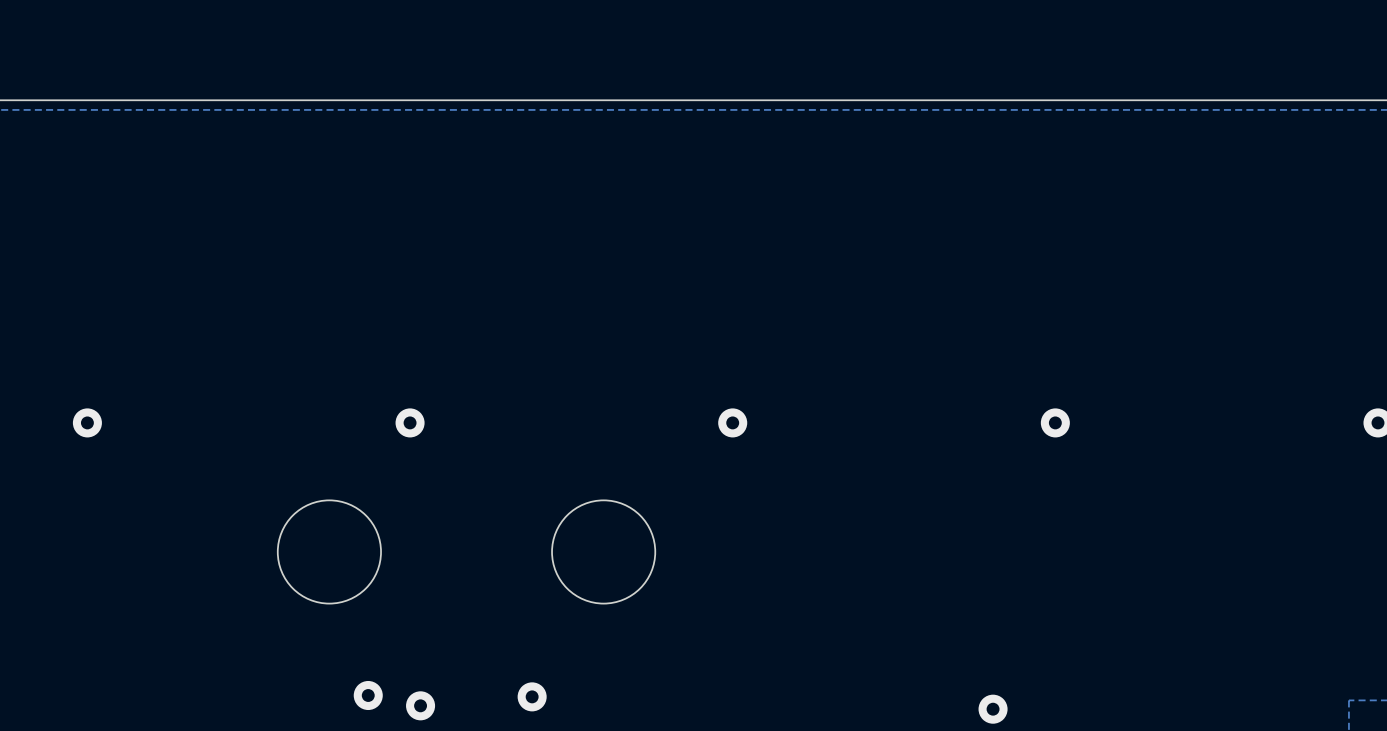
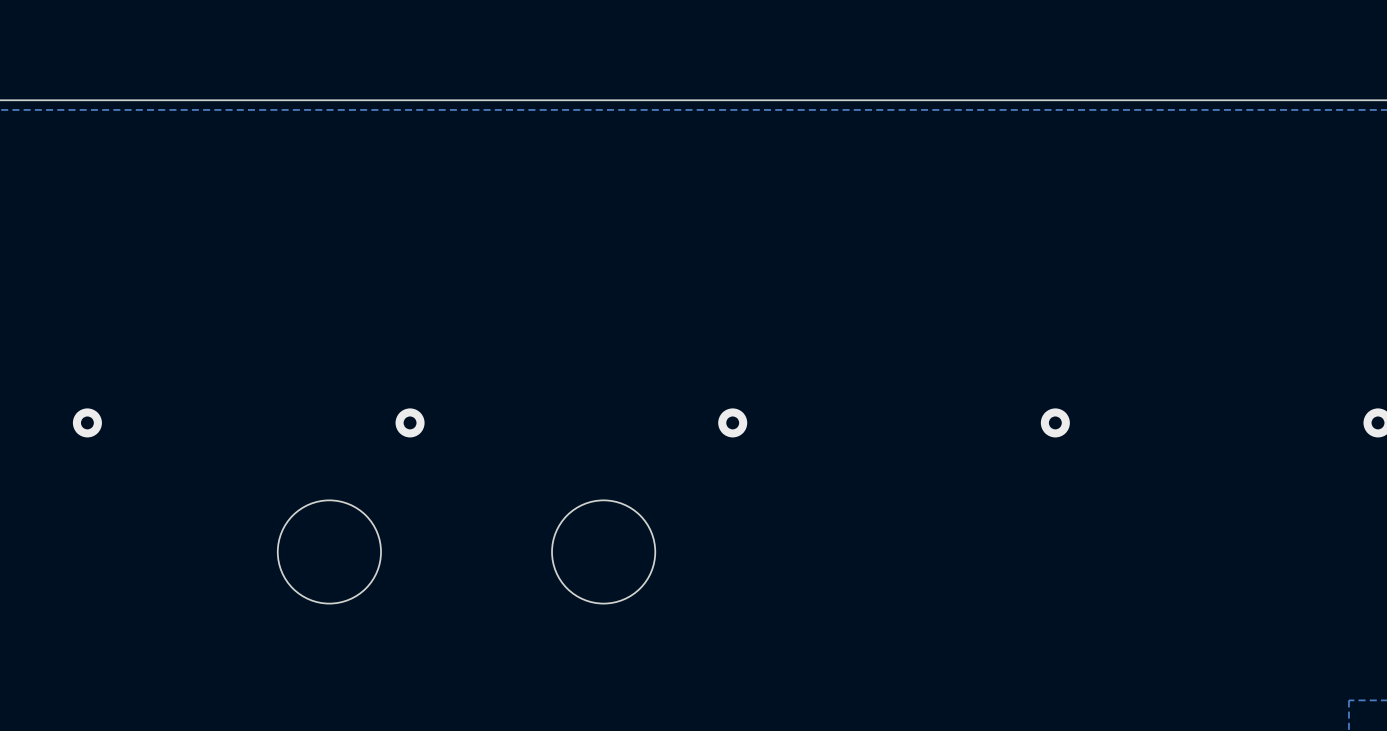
via: (368, 695) -> none
via: (532, 696) -> none
via: (420, 705) -> none
via: (993, 709) -> none

